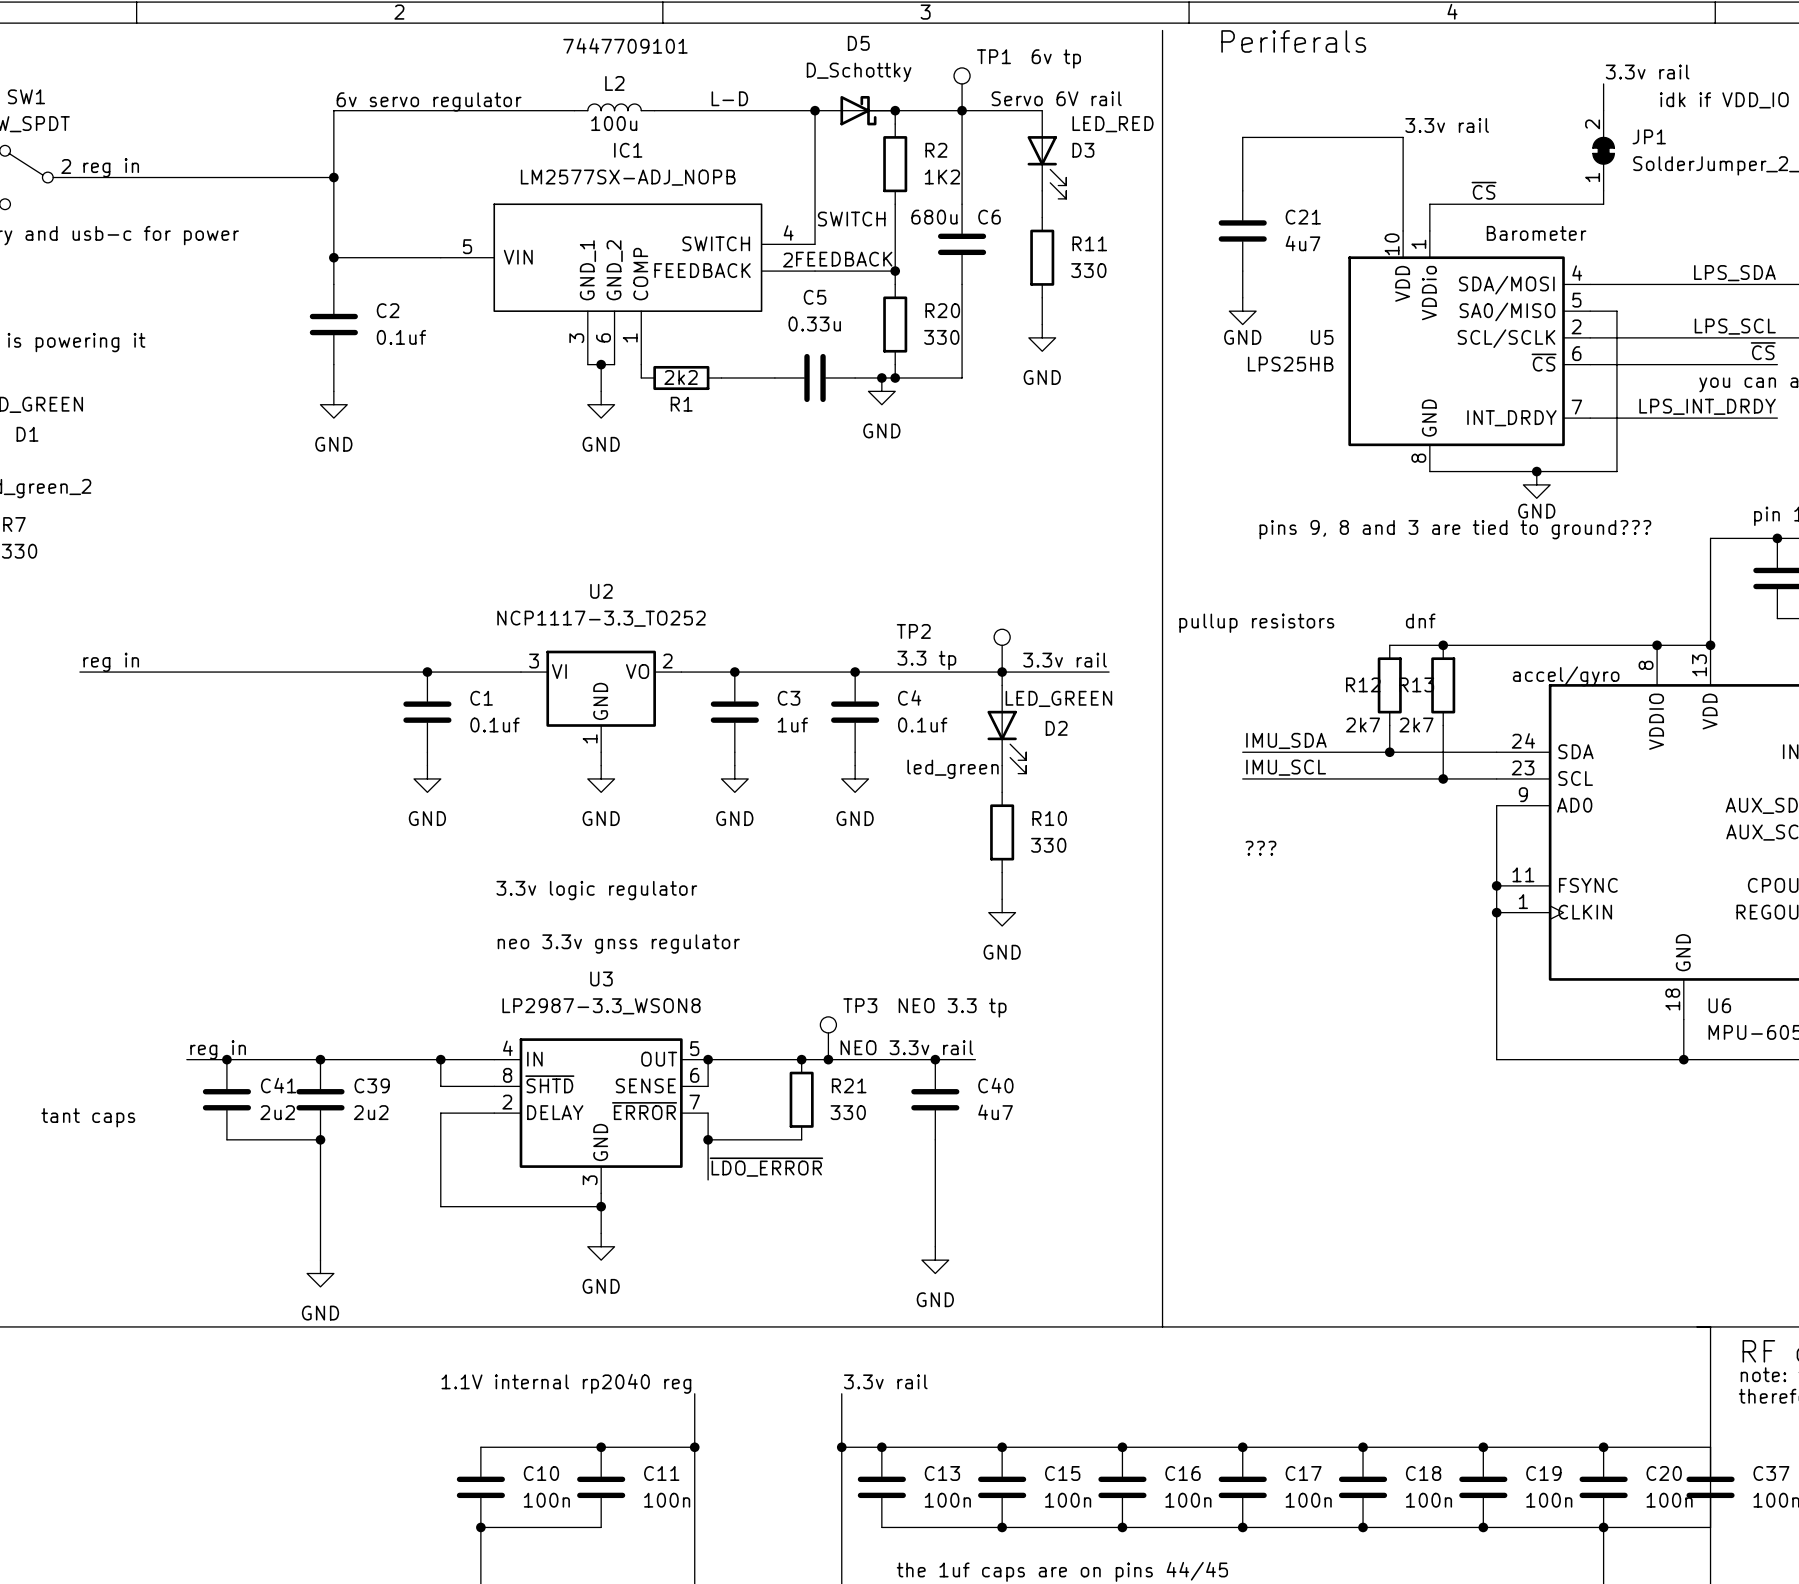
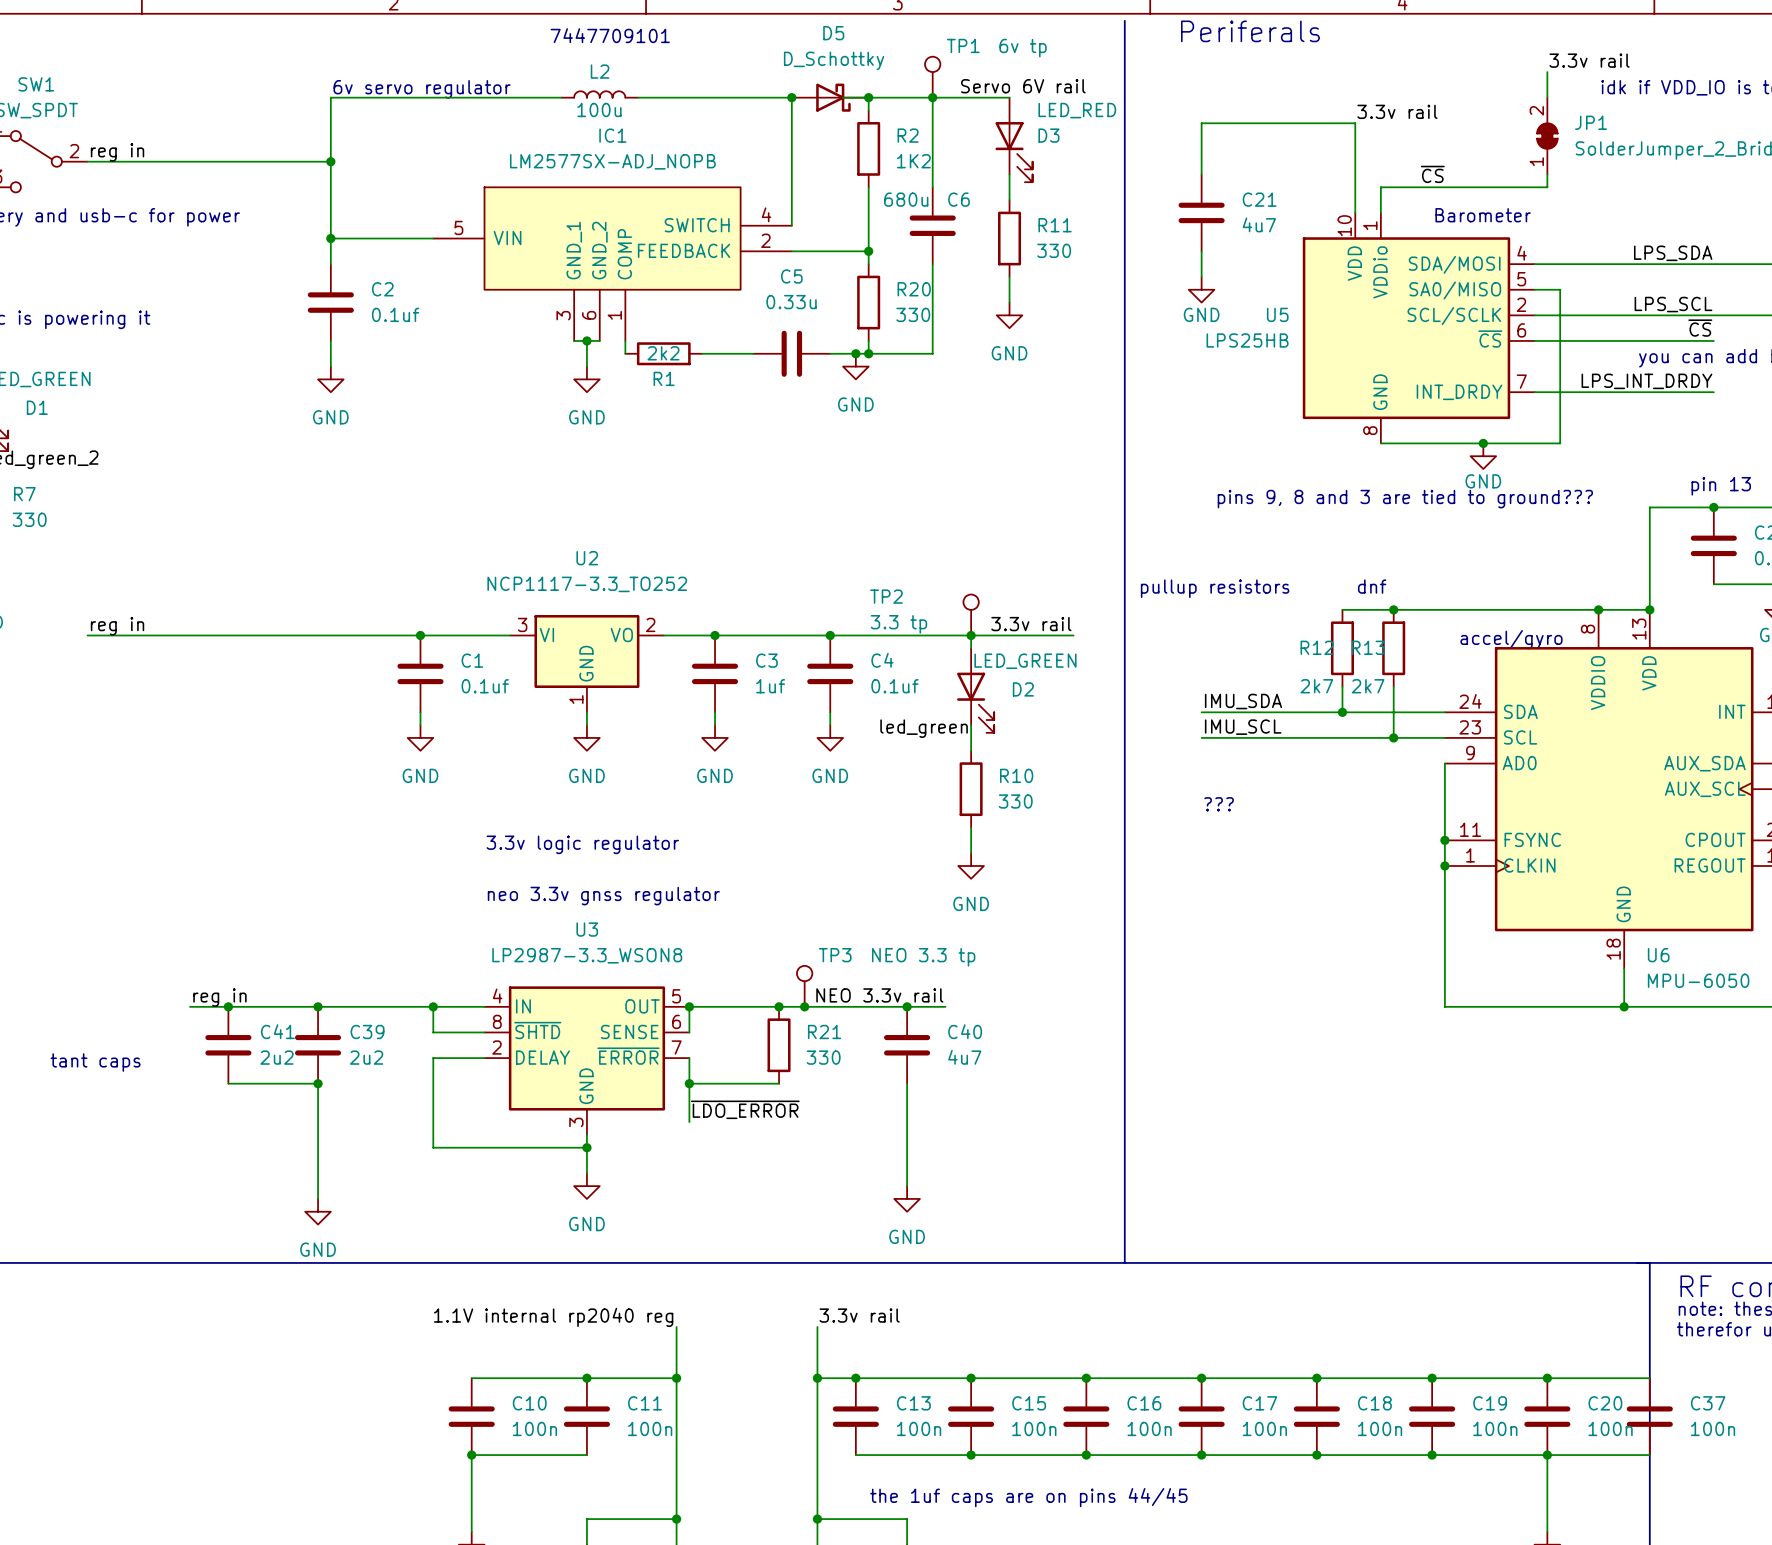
label: L-D (729, 98) -> none
label: SWITCH (851, 219) -> none
label: FEEDBACK (844, 259) -> none

